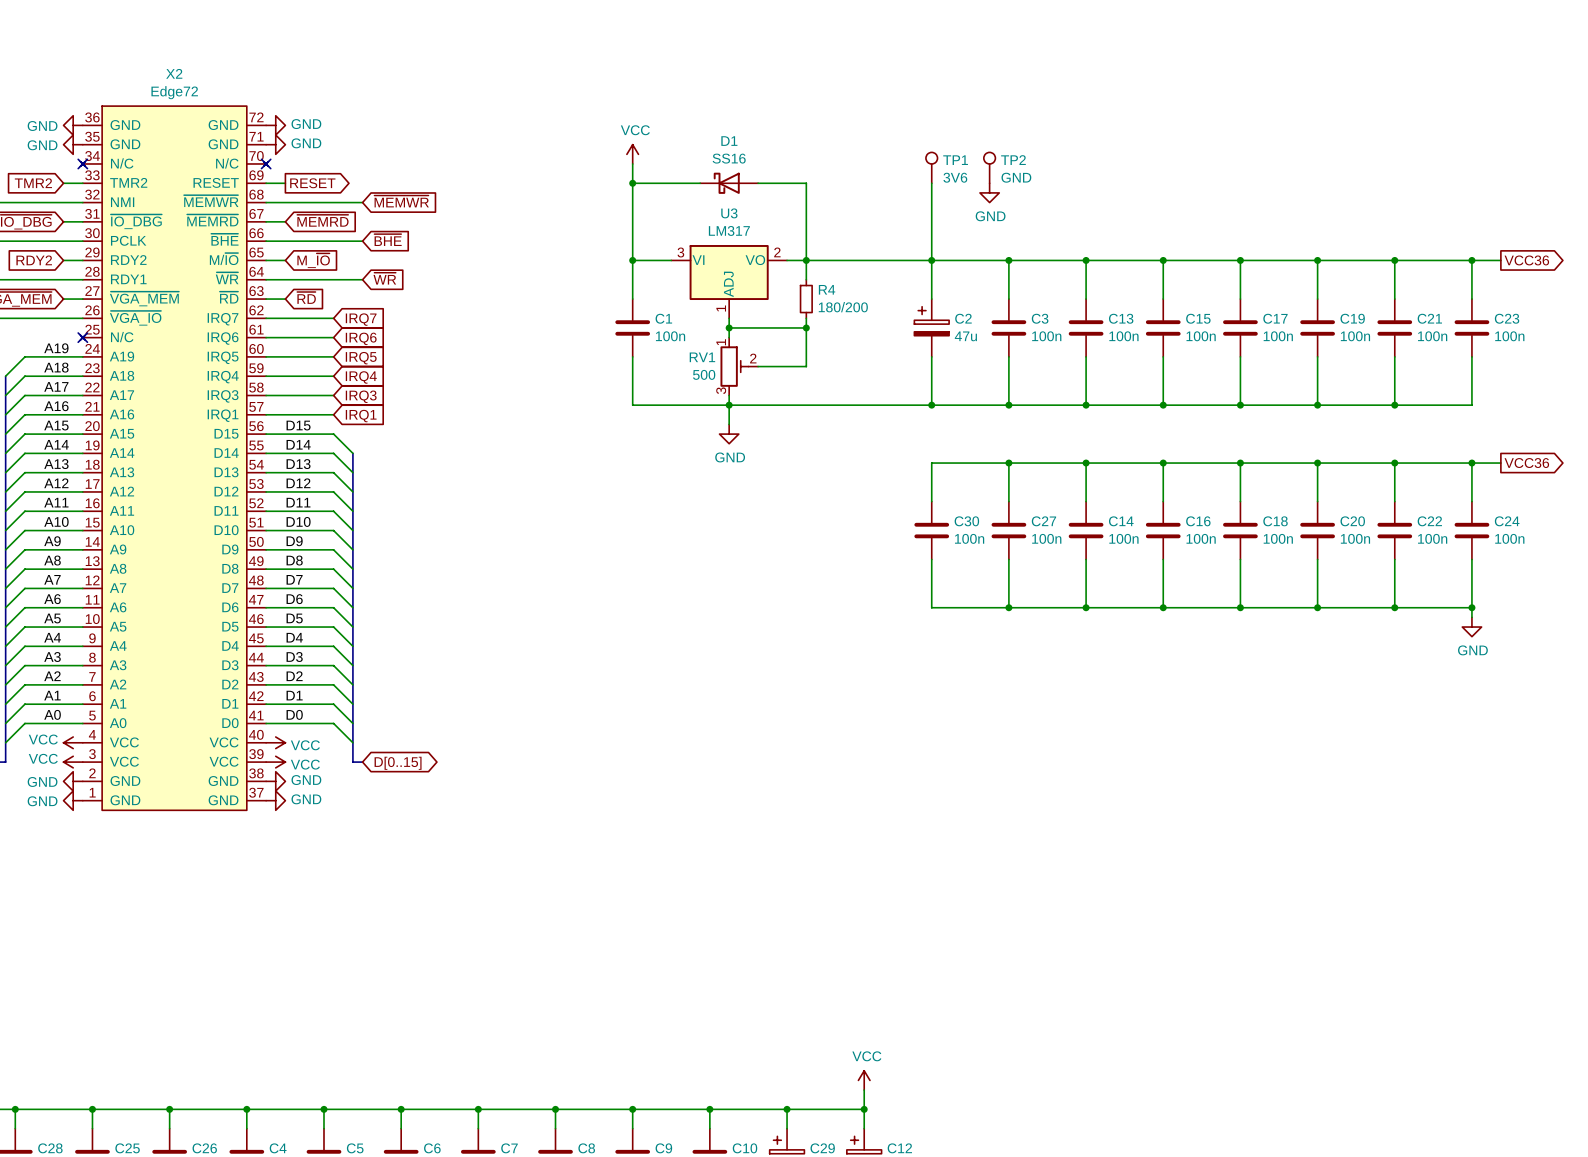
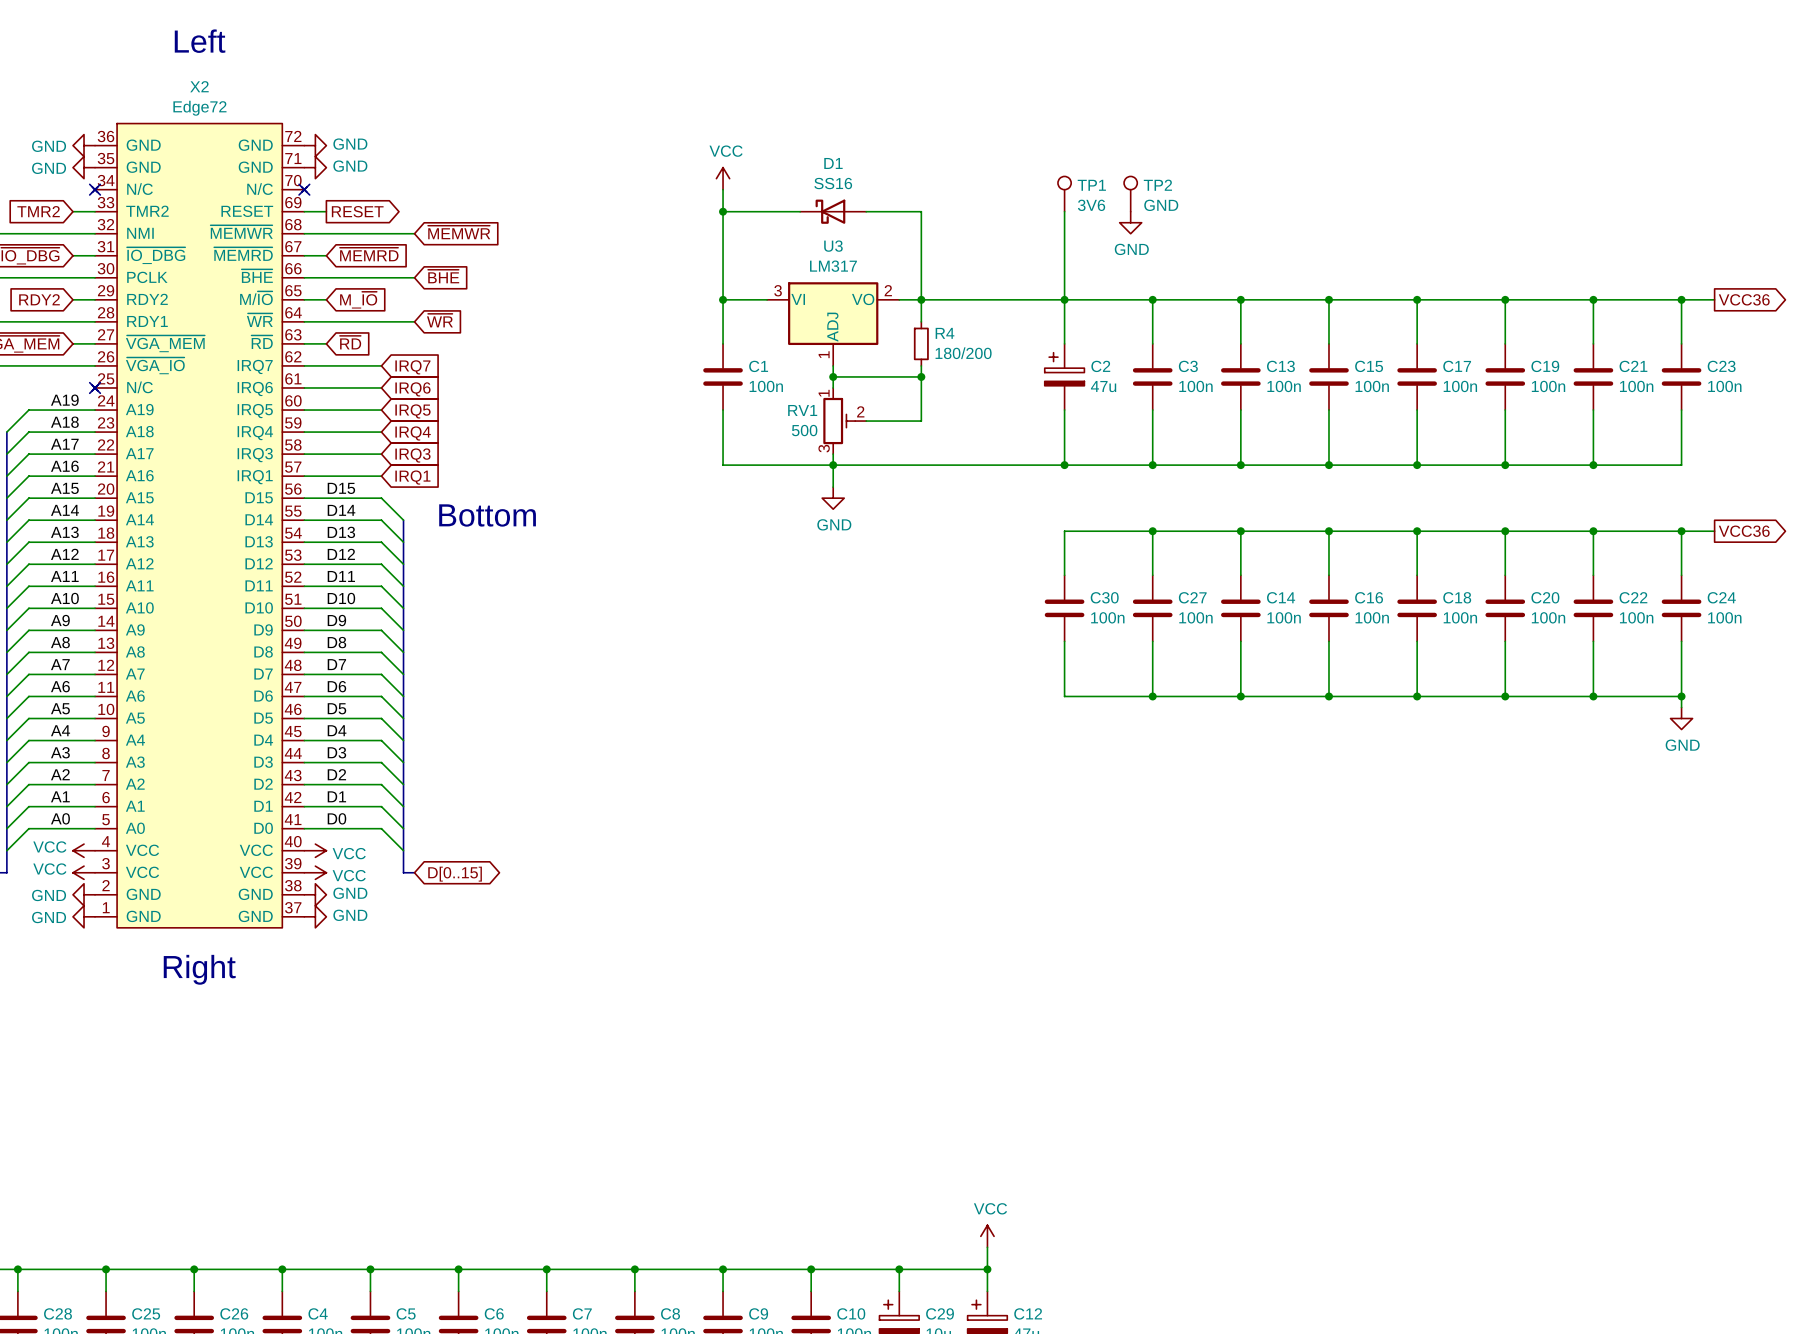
text: none -> Left (200, 41)
text: none -> Bottom (487, 515)
text: none -> Right (199, 969)

